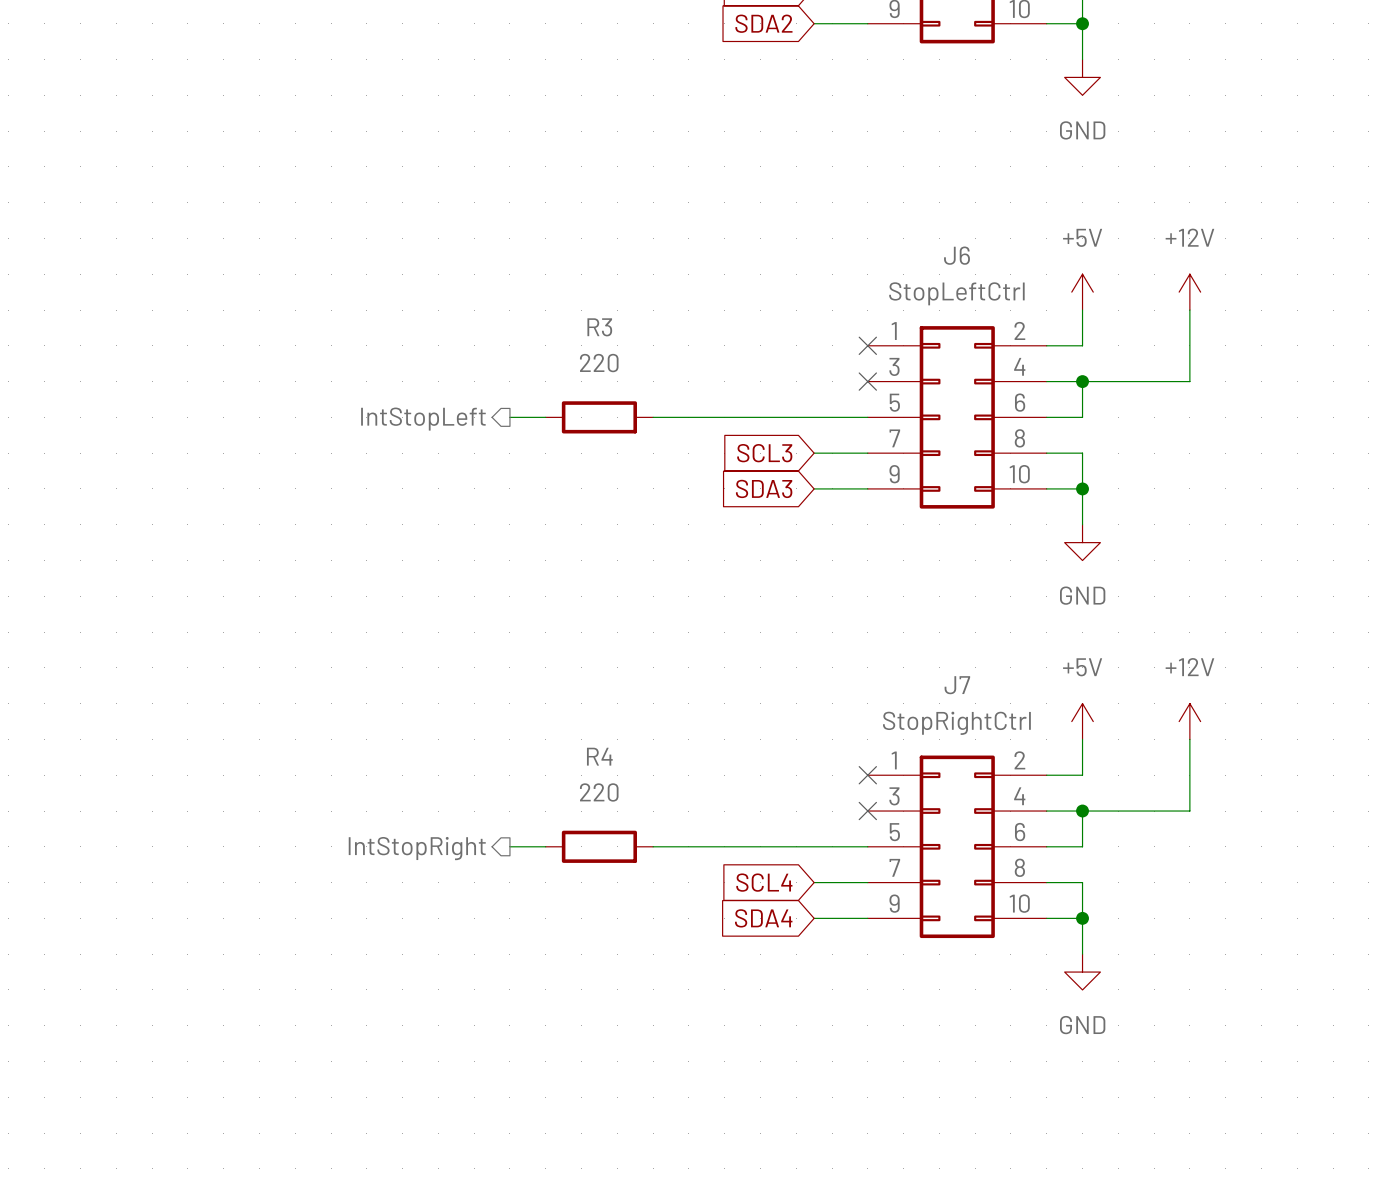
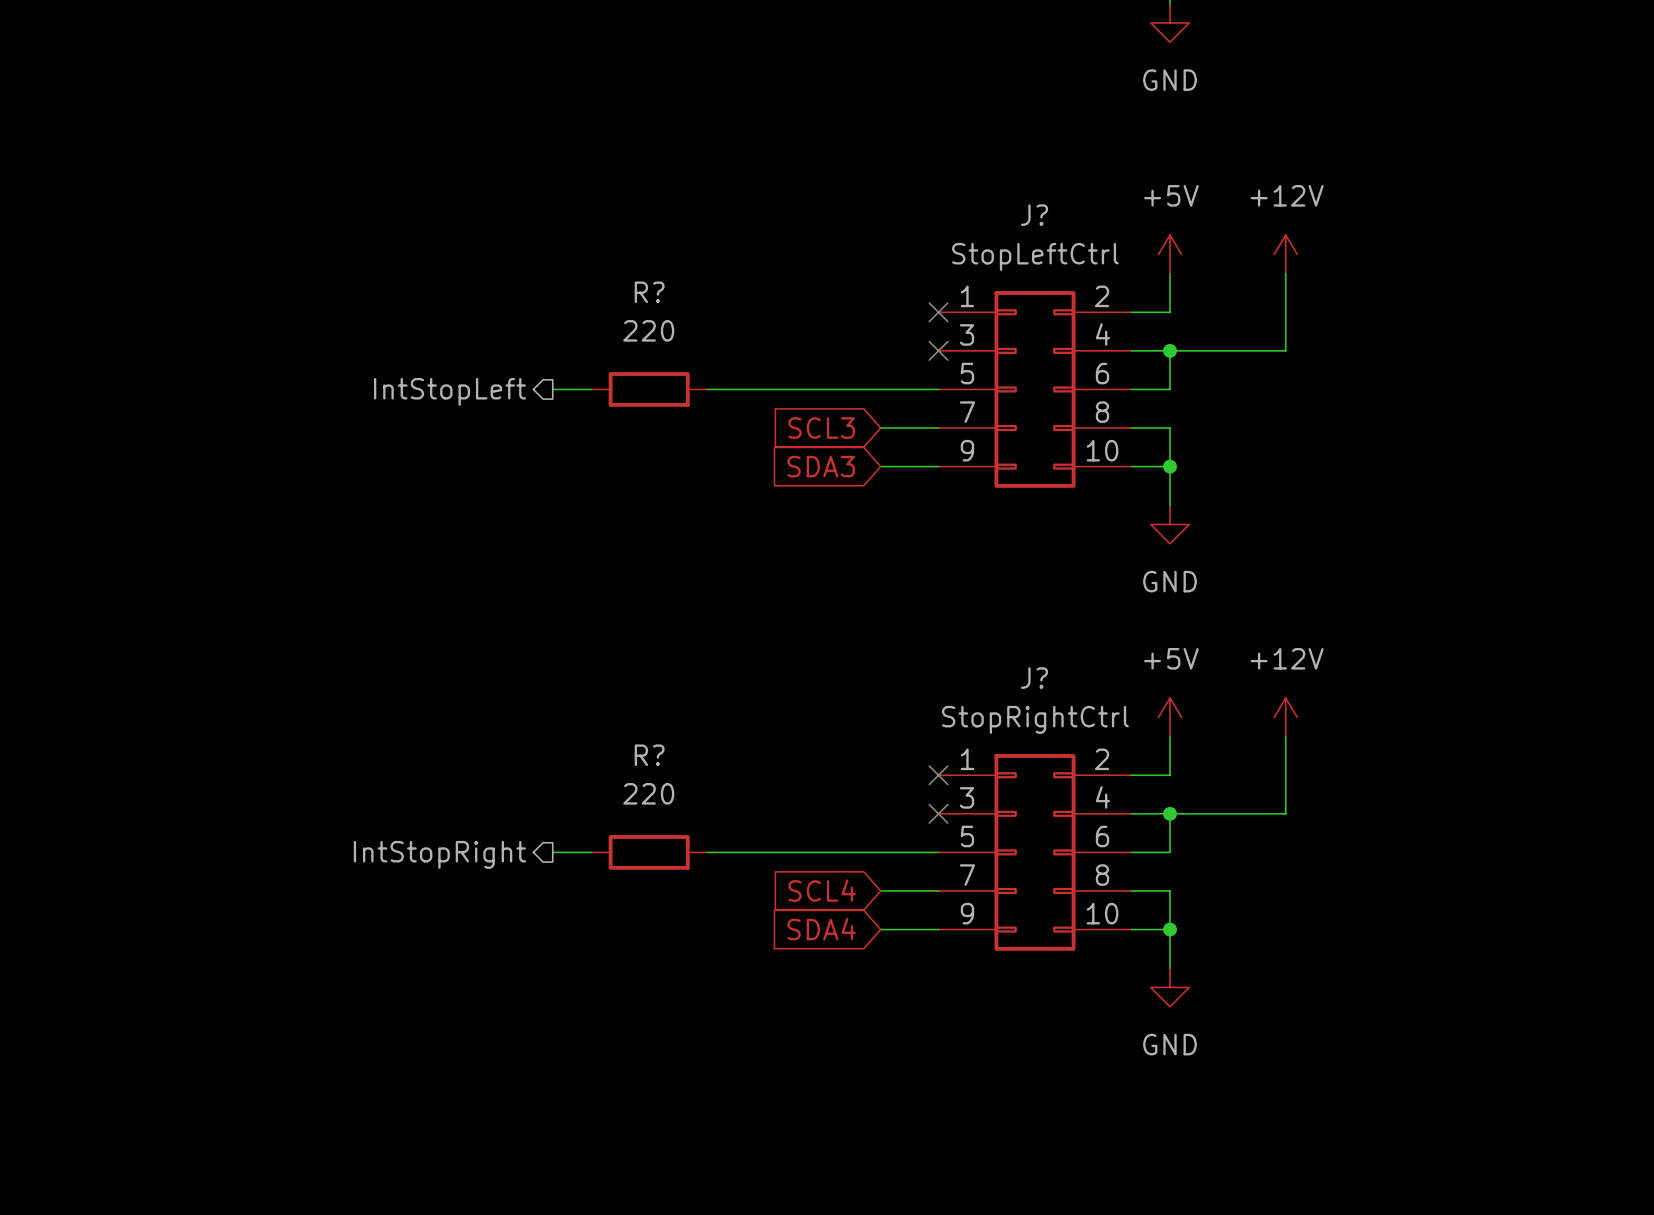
J6 name: J6 (957, 255) -> J? (1034, 215)
R3 name: R3 (599, 327) -> R? (649, 292)
J7 name: J7 (957, 685) -> J? (1034, 678)
R4 name: R4 (599, 756) -> R? (649, 755)

